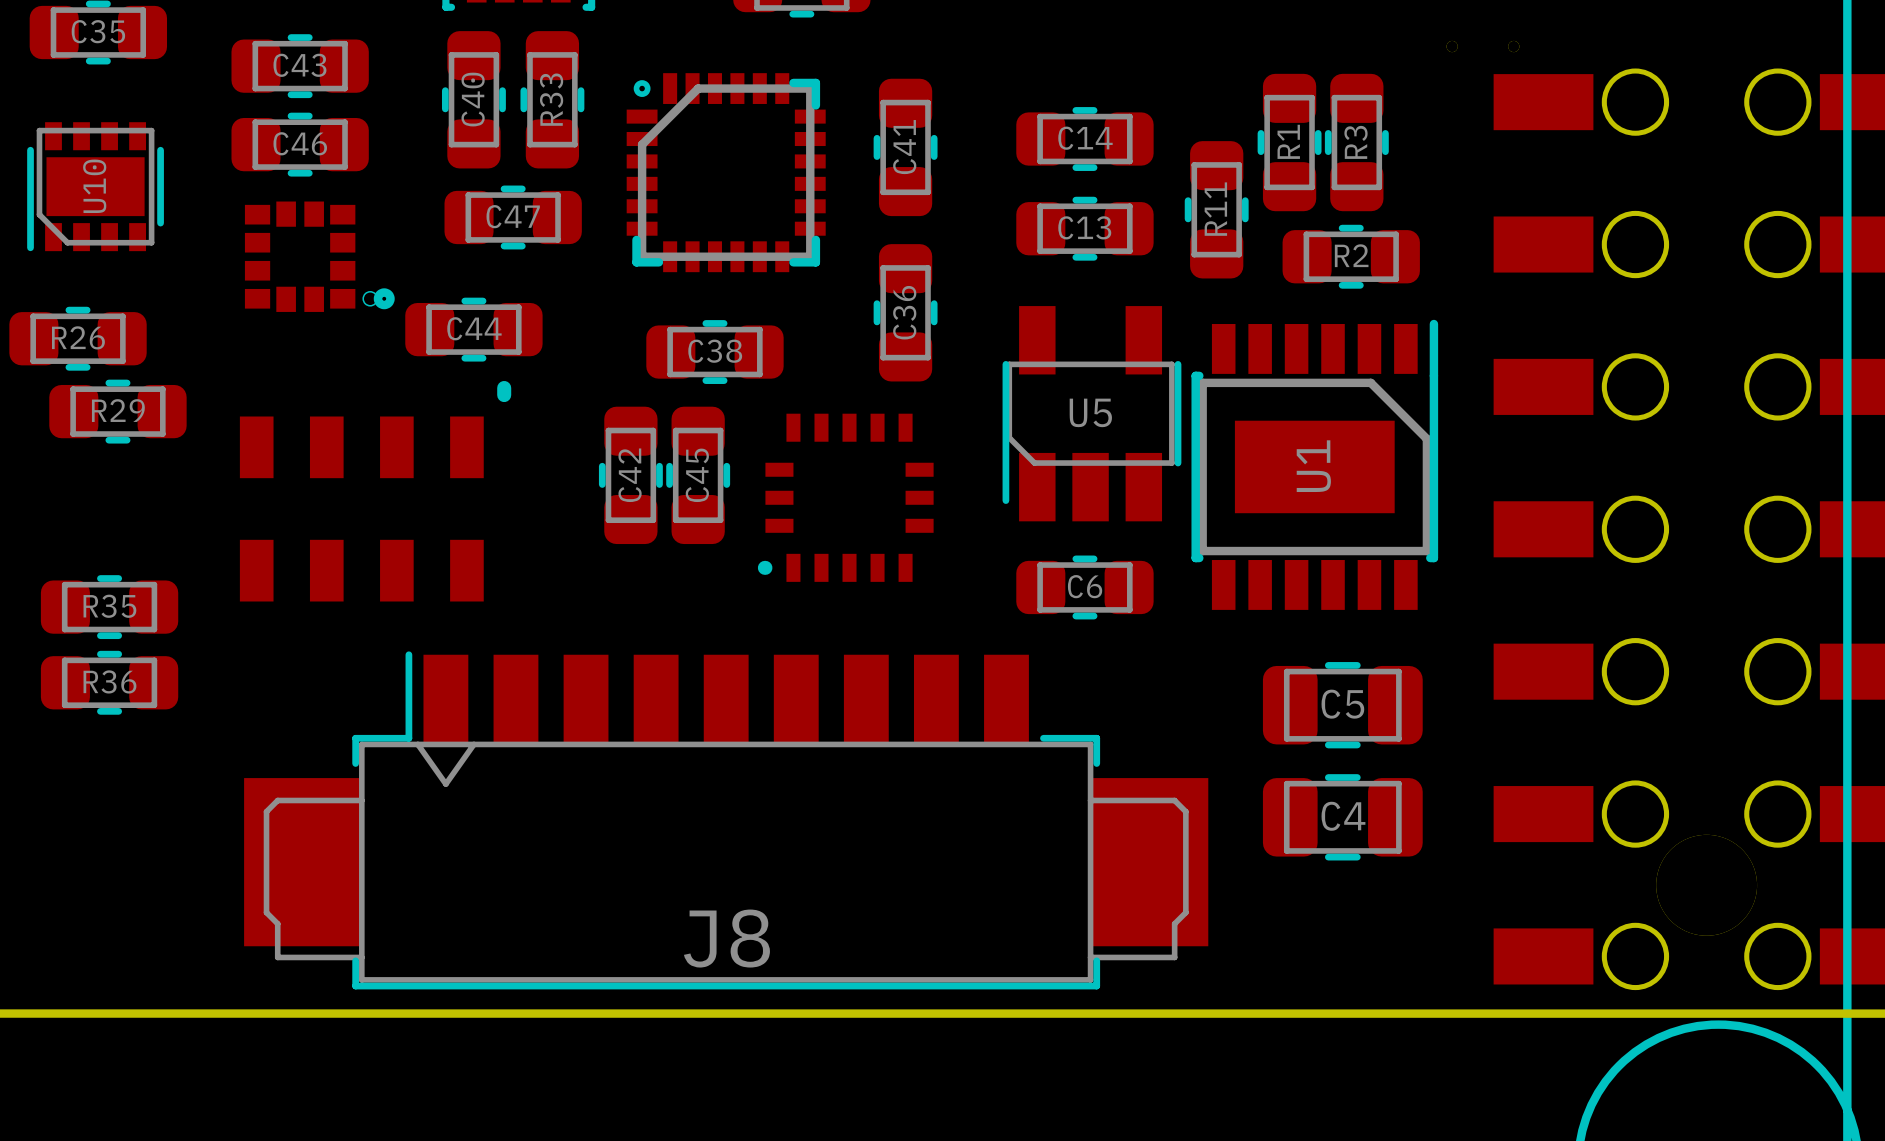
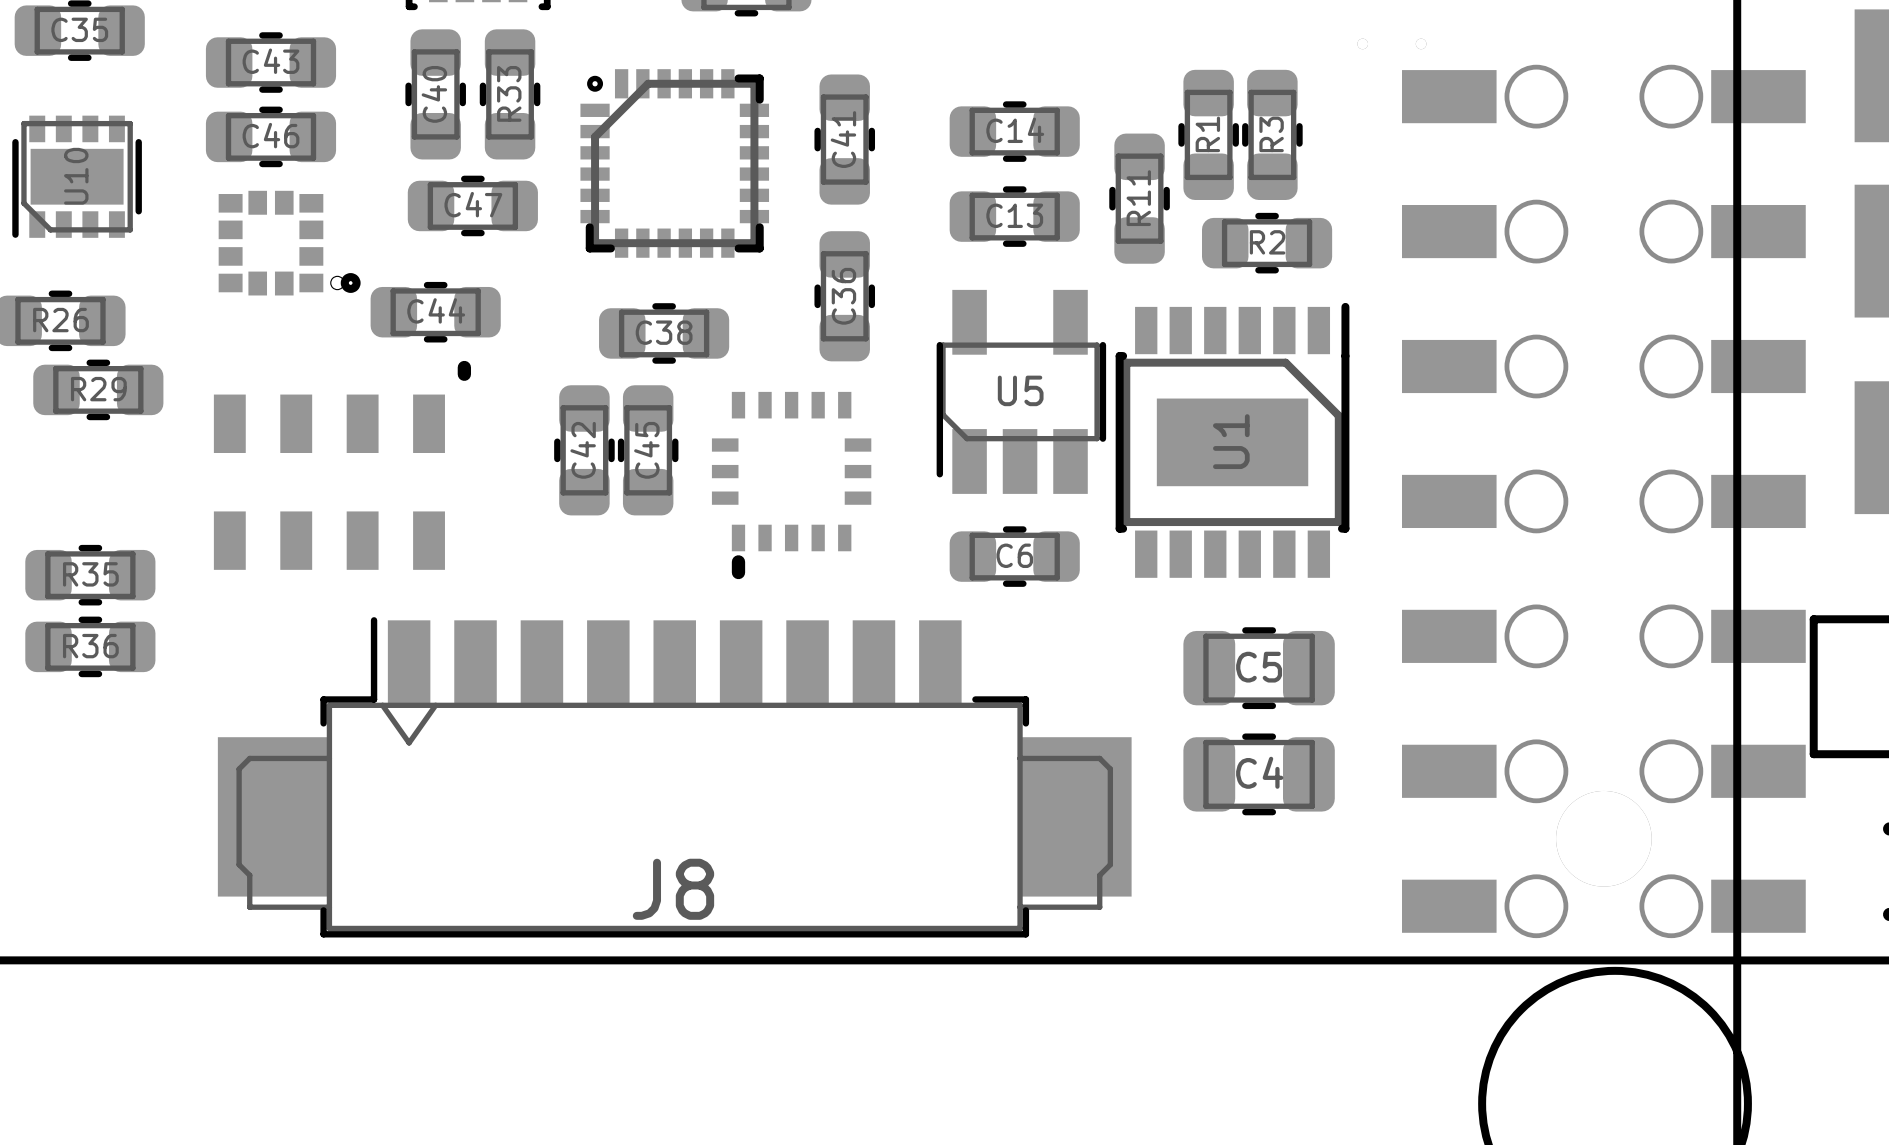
part footprint: [757, 413, 934, 582] -> [711, 391, 872, 580]

